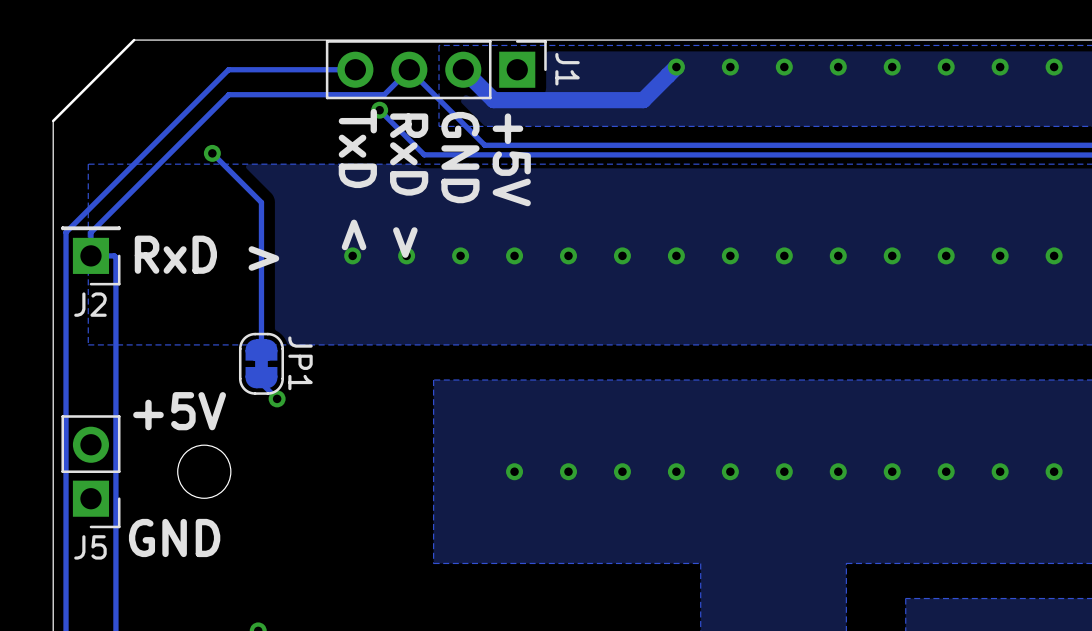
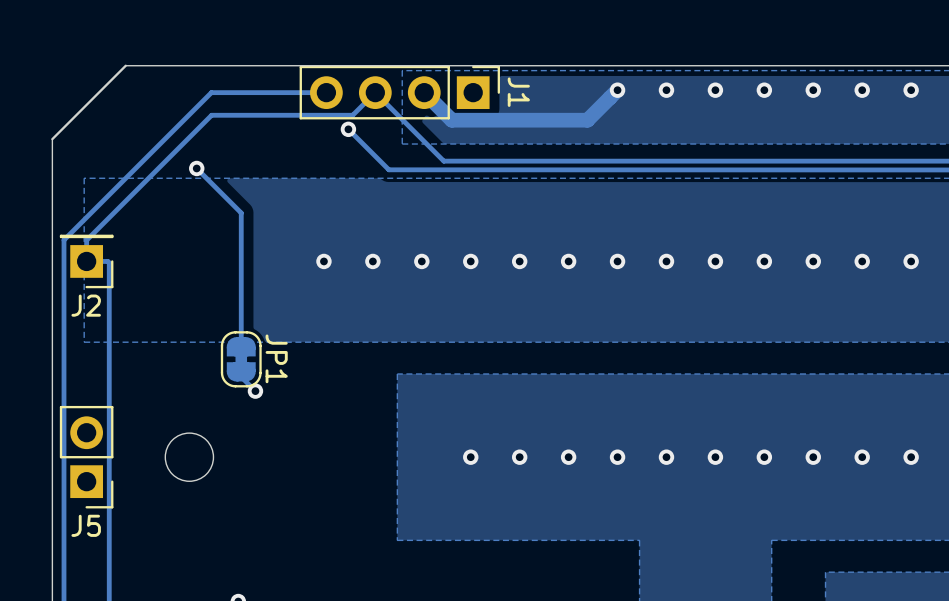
text: GND (460, 157) -> none
text: +5V (511, 159) -> none
text: TxD < (357, 179) -> none
text: RxD > (409, 185) -> none
text: RxD > (206, 254) -> none
text: +5V (179, 411) -> none
text: GND (174, 537) -> none

